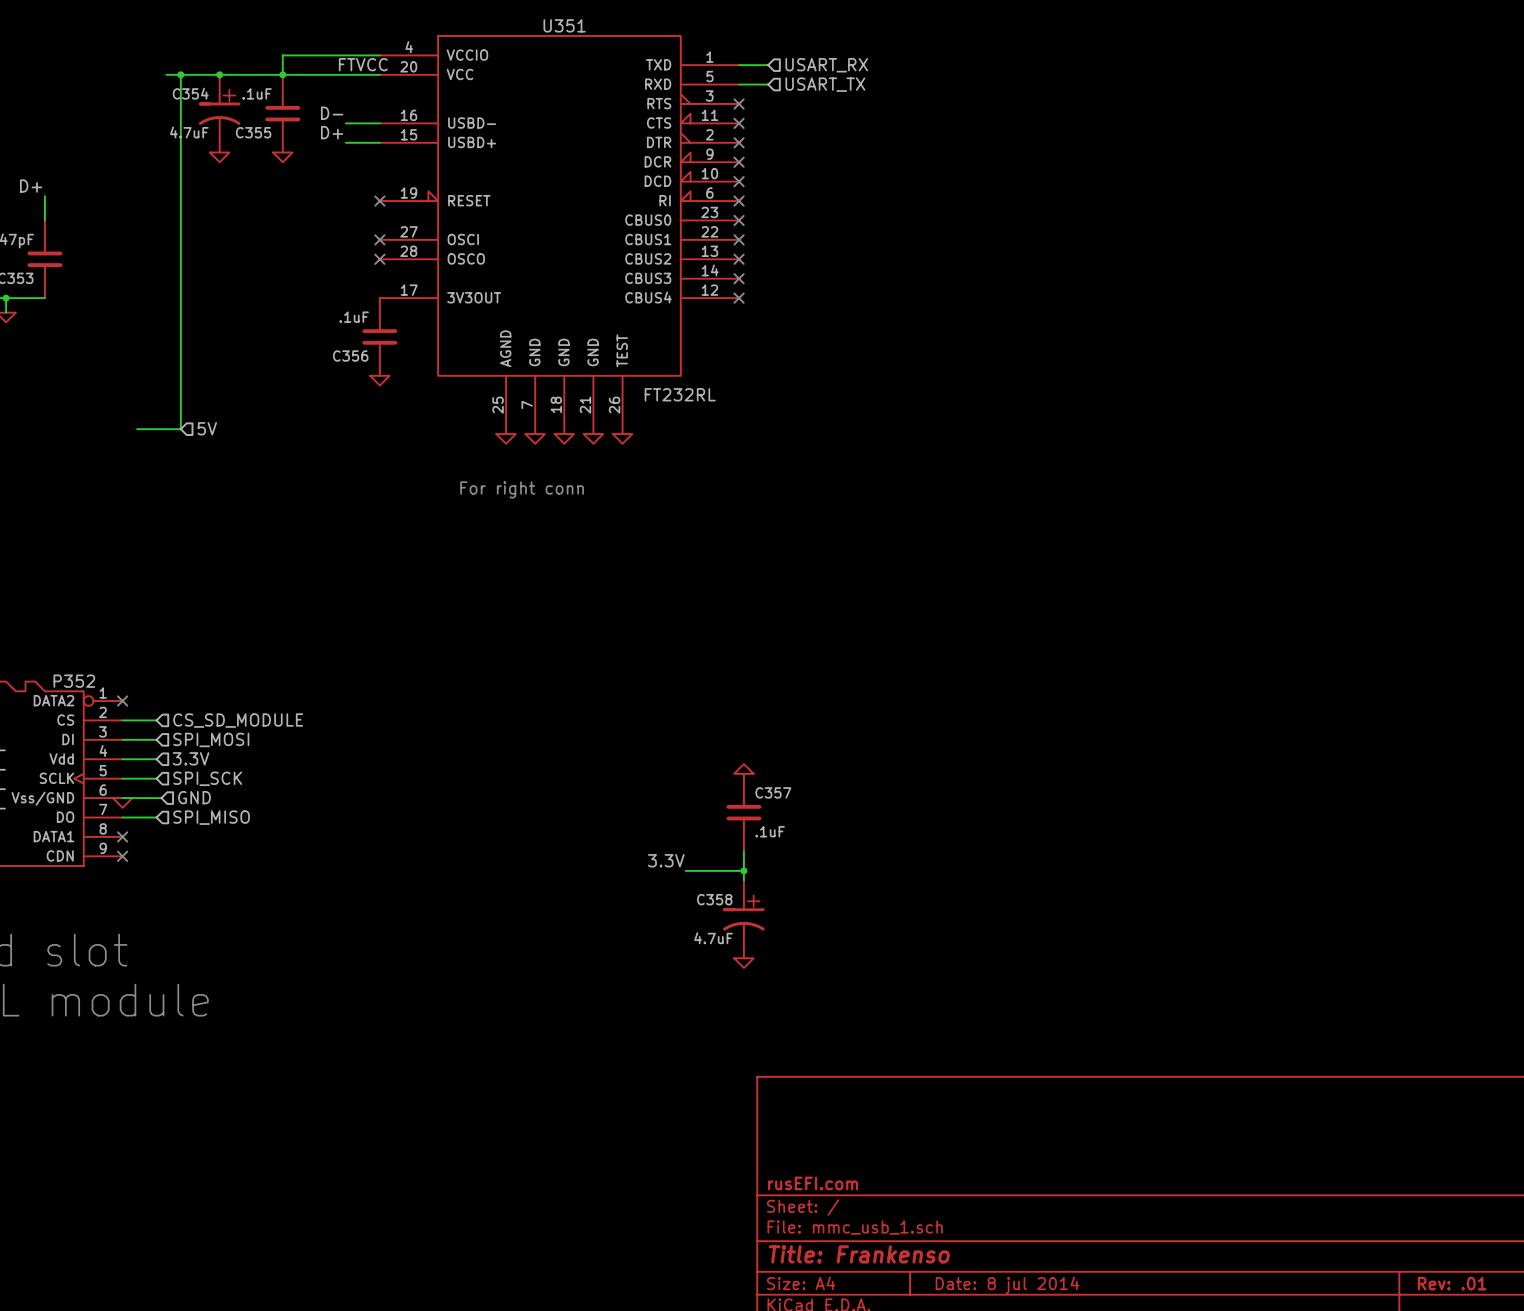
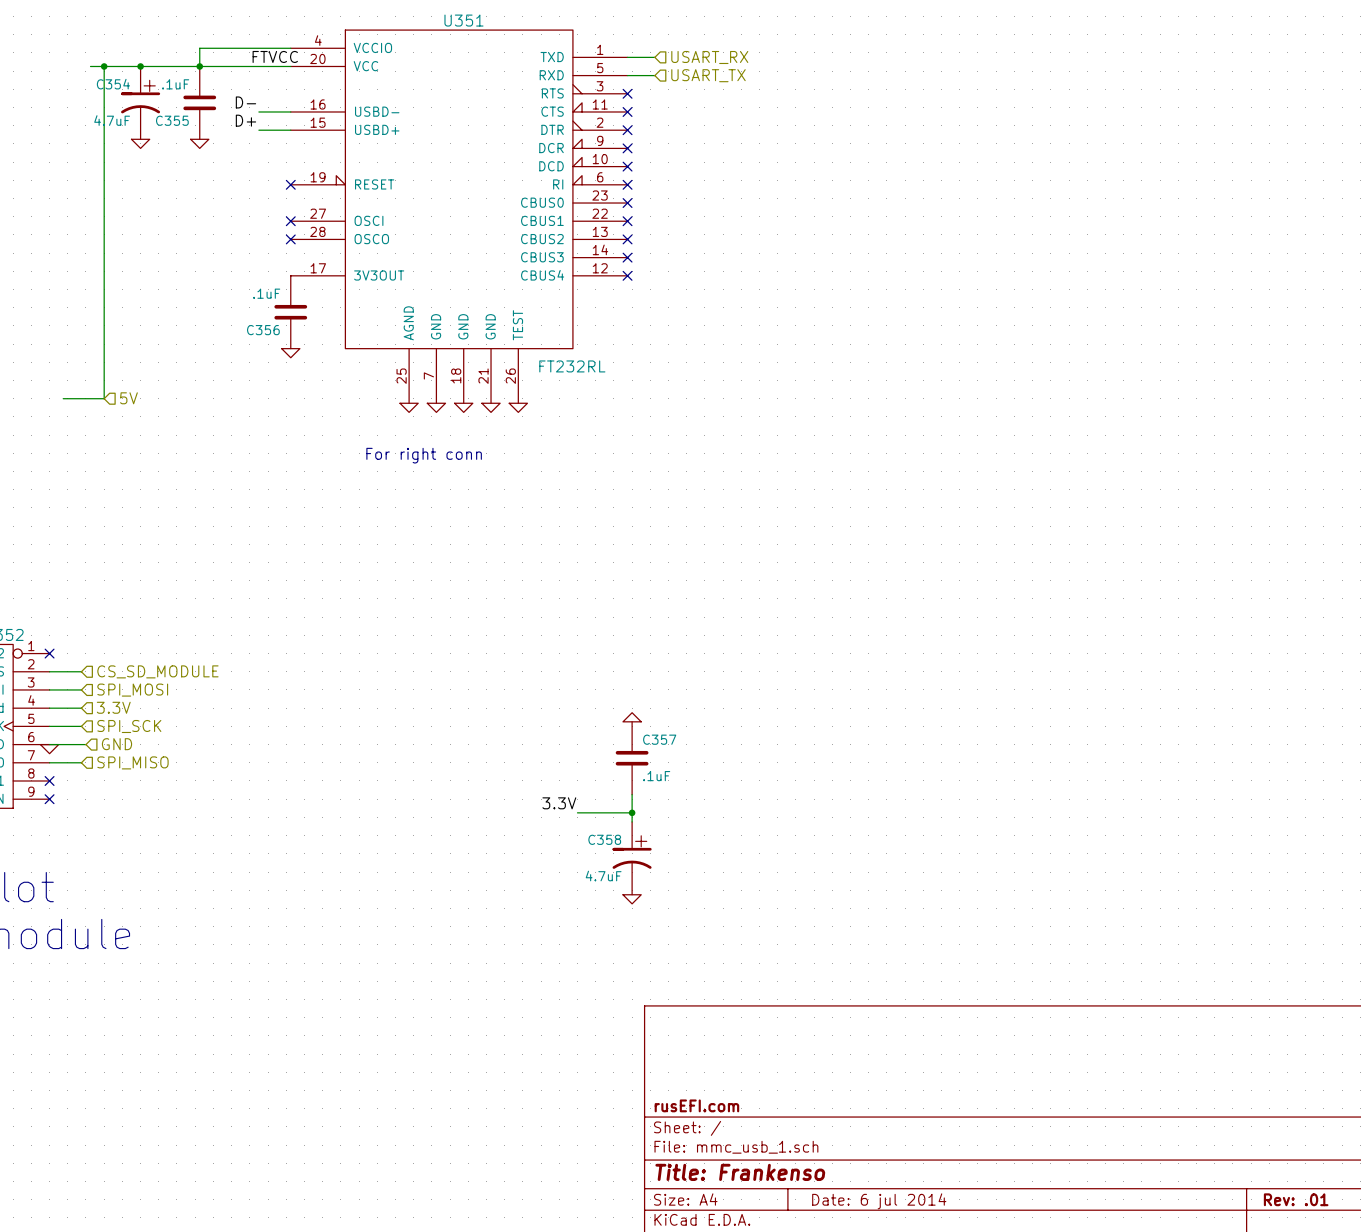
title block: Date: 8 jul 2014 (1007, 1285) -> Date: 6 jul 2014 (879, 1201)

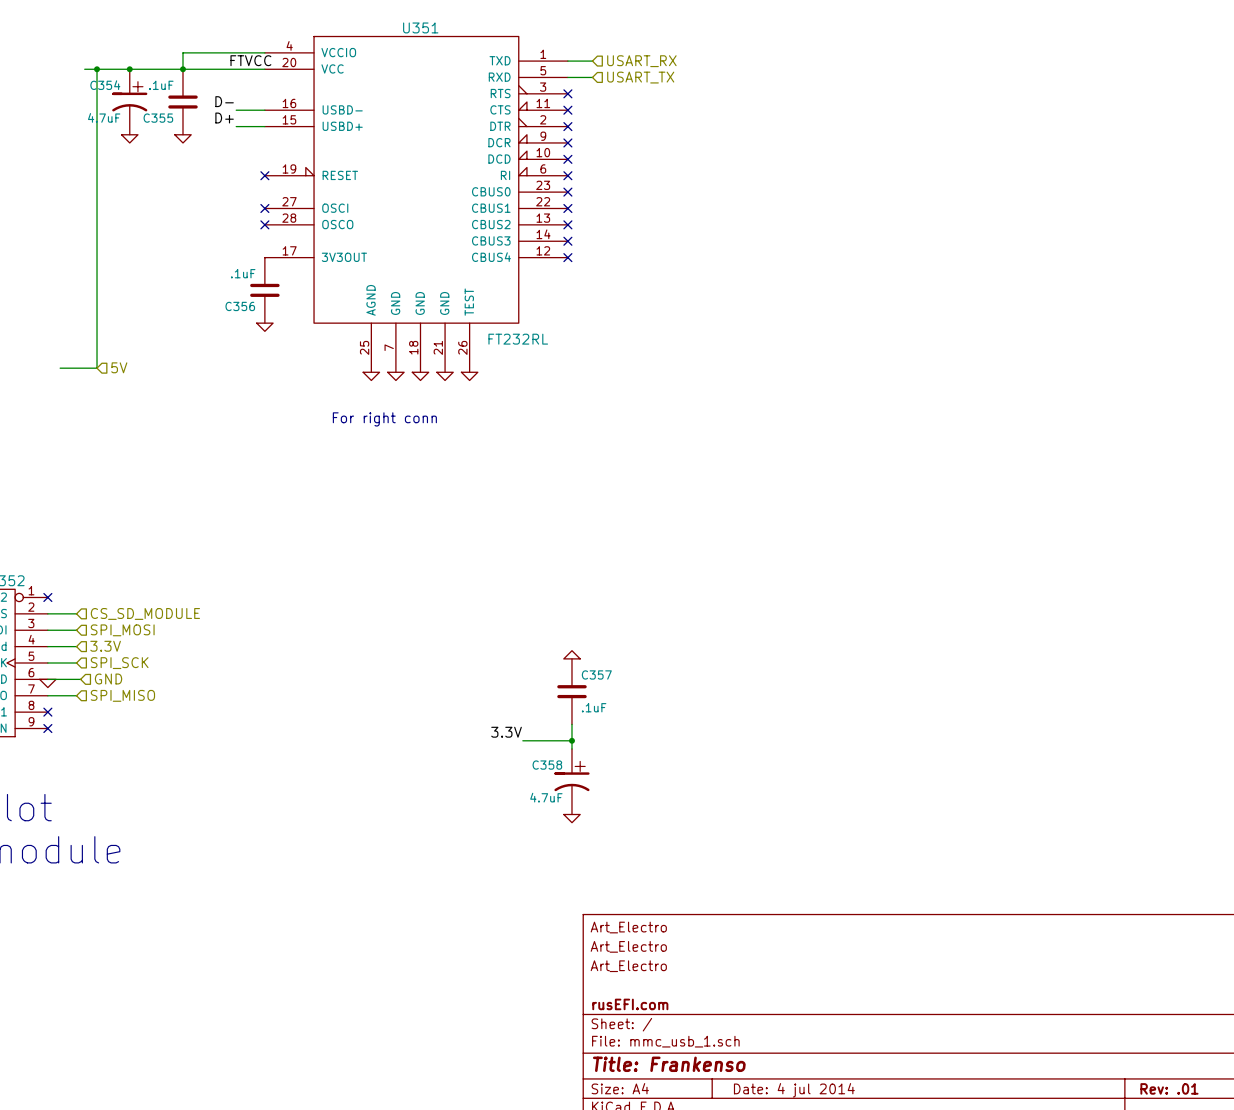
title block: none -> Art_Electro (628, 927)
title block: none -> Art_Electro (628, 946)
title block: none -> Art_Electro (628, 966)
title block: Date: 6 jul 2014 (879, 1201) -> Date: 4 jul 2014 (794, 1090)

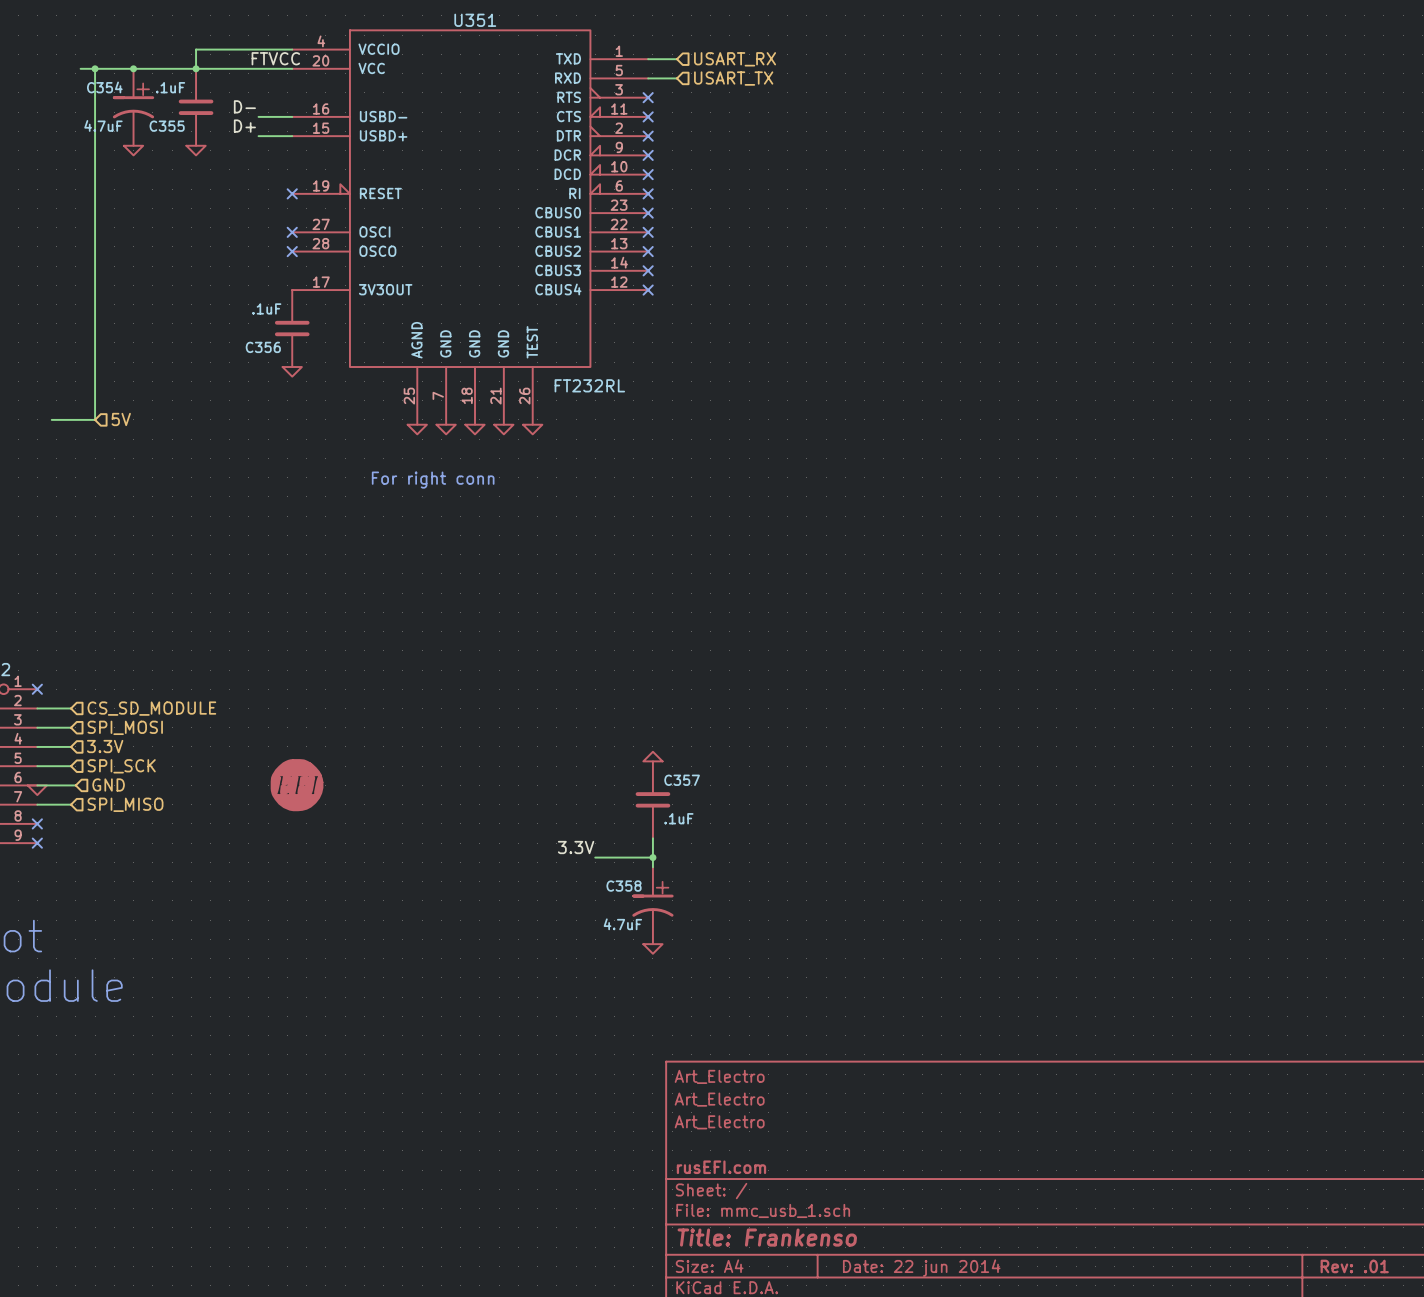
part: none -> (297, 785)
title block: Date: 4 jul 2014 (794, 1090) -> Date: 22 jun 2014 (921, 1268)

